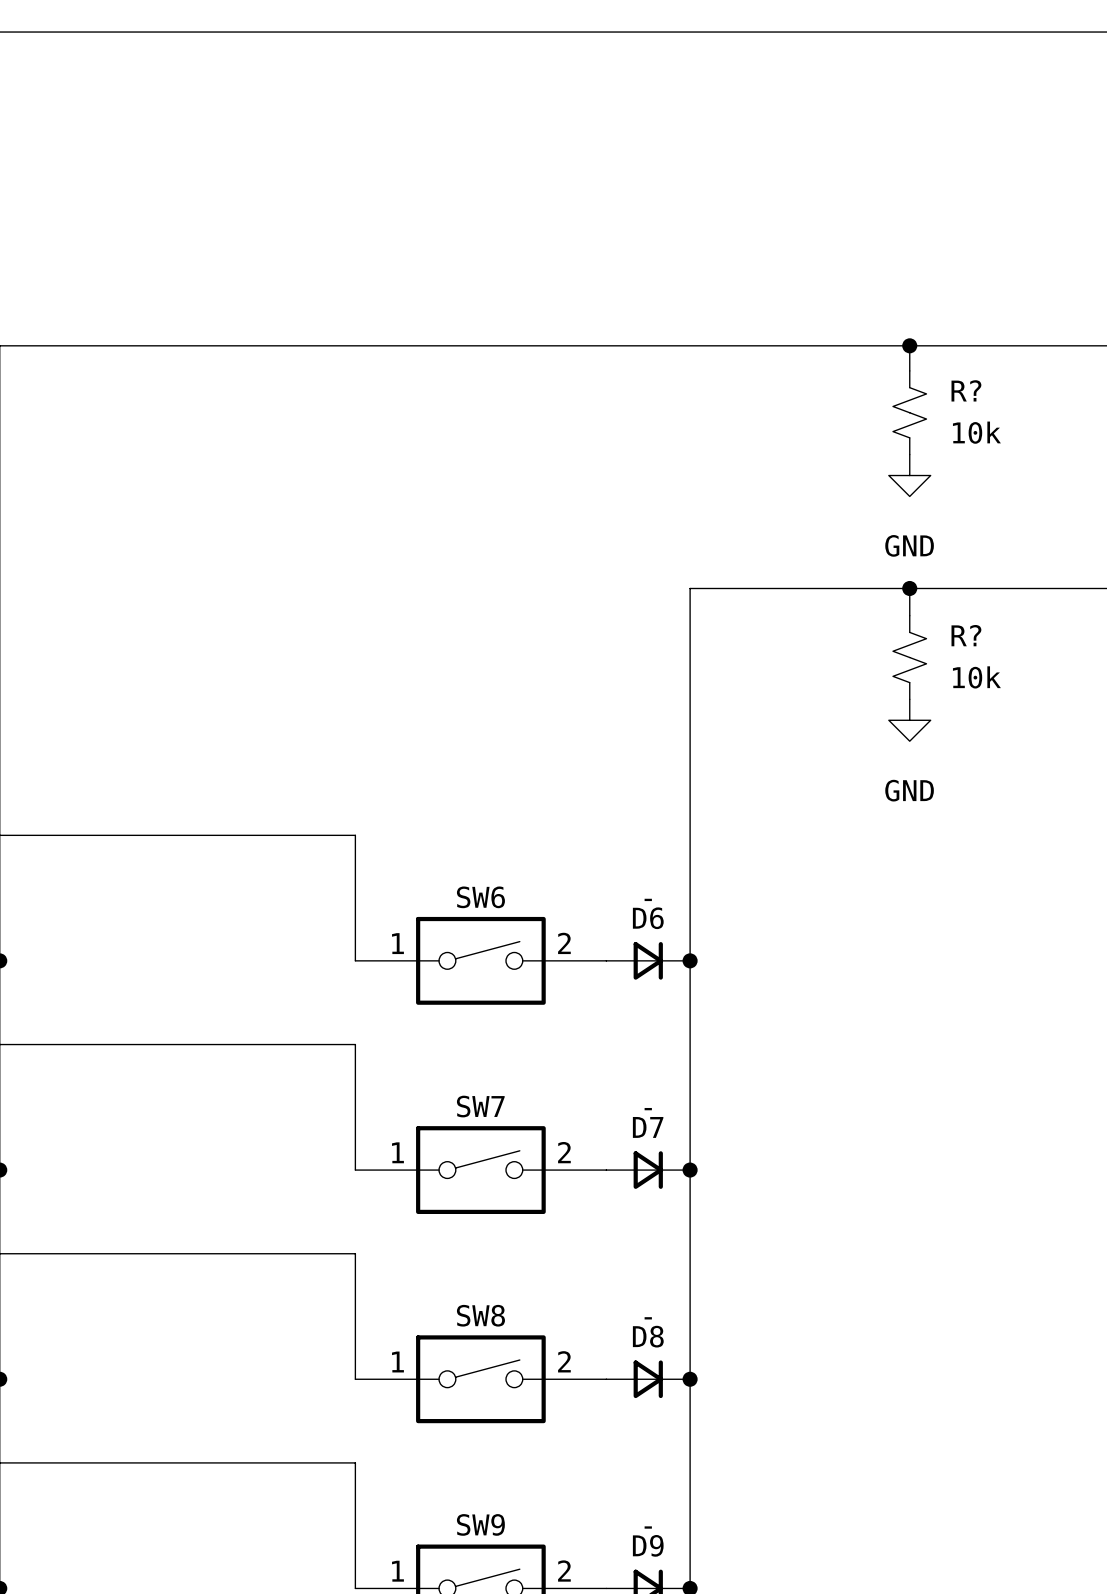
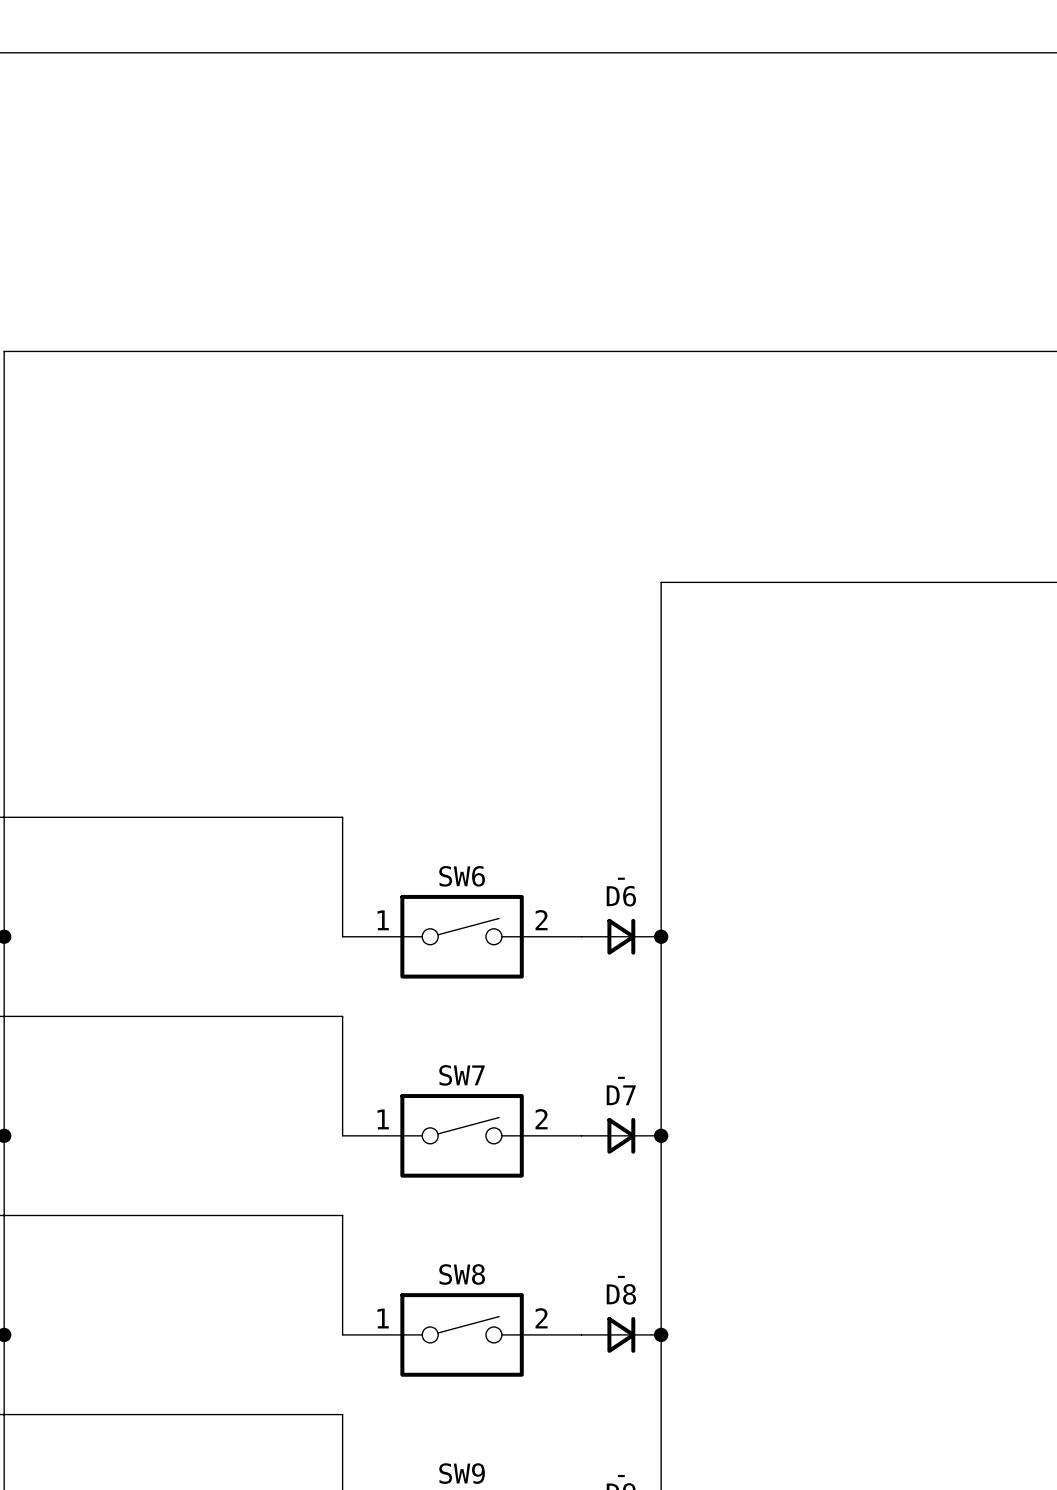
wire: (909, 345) (909, 370) -> none
junction: (909, 345) -> none
R?: 10k (909, 412) -> none
power symbol: GND (909, 475) -> none
wire: (909, 588) (909, 615) -> none
junction: (909, 588) -> none
R?: 10k (909, 657) -> none
power symbol: GND (909, 720) -> none

